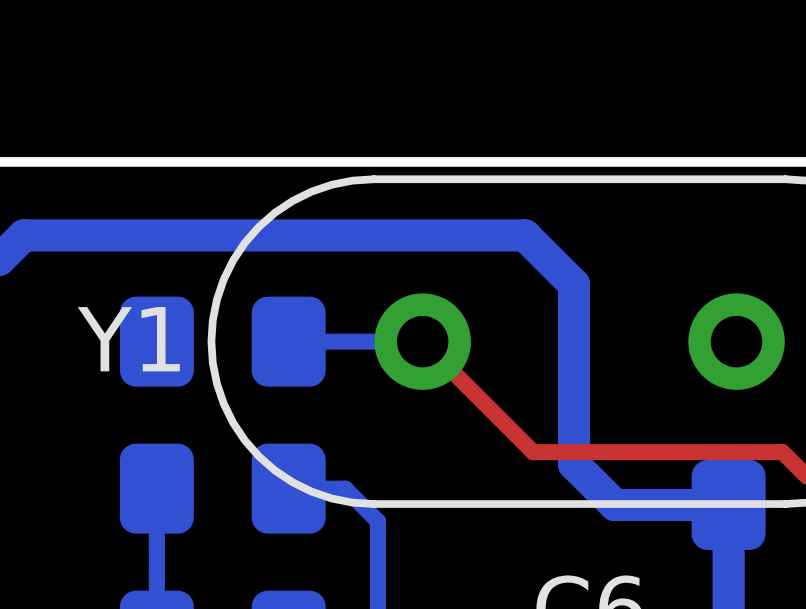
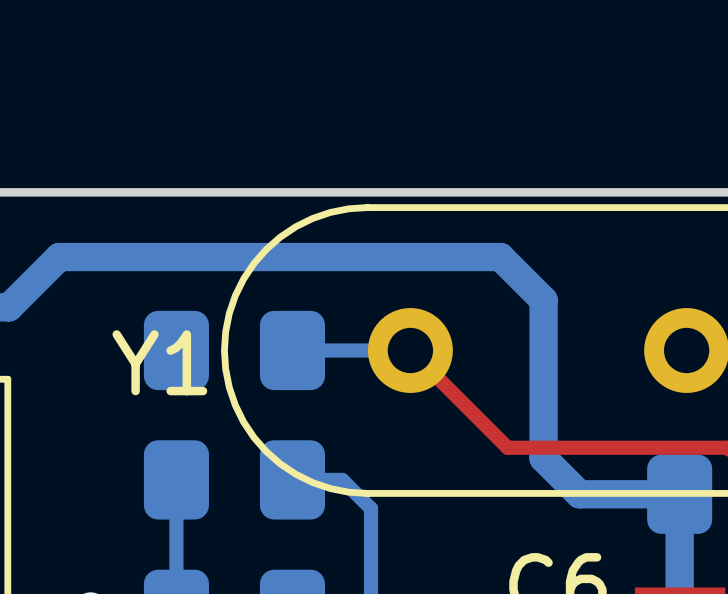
Y1 name position: Y1 (128, 339) -> Y1 (159, 362)

